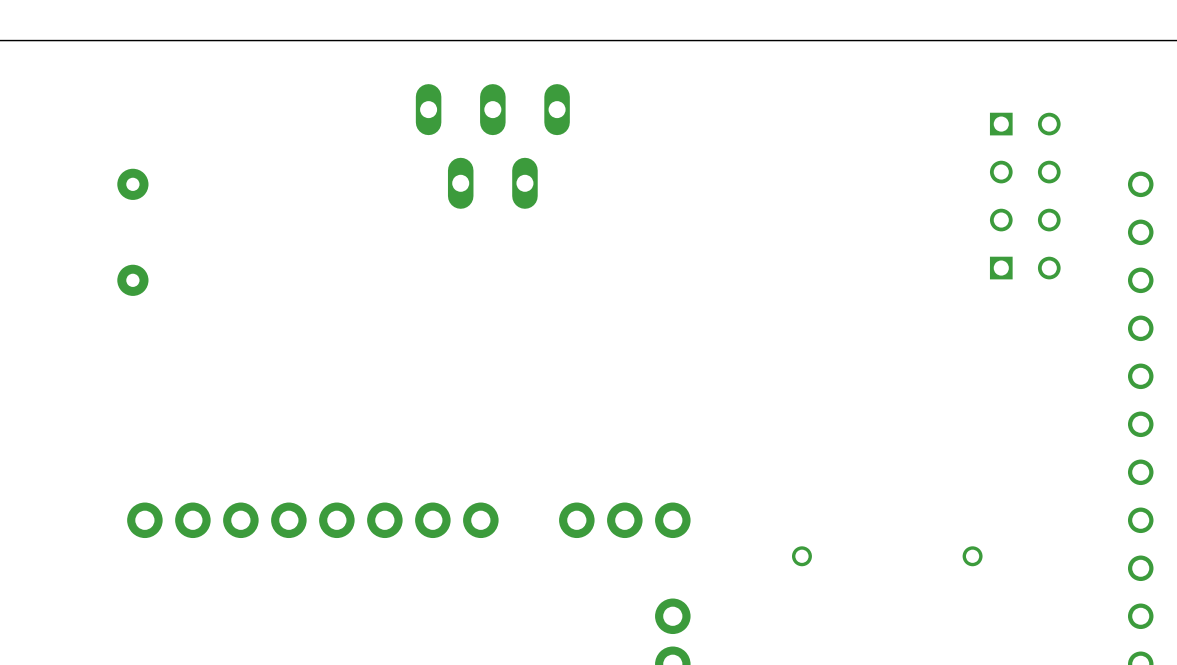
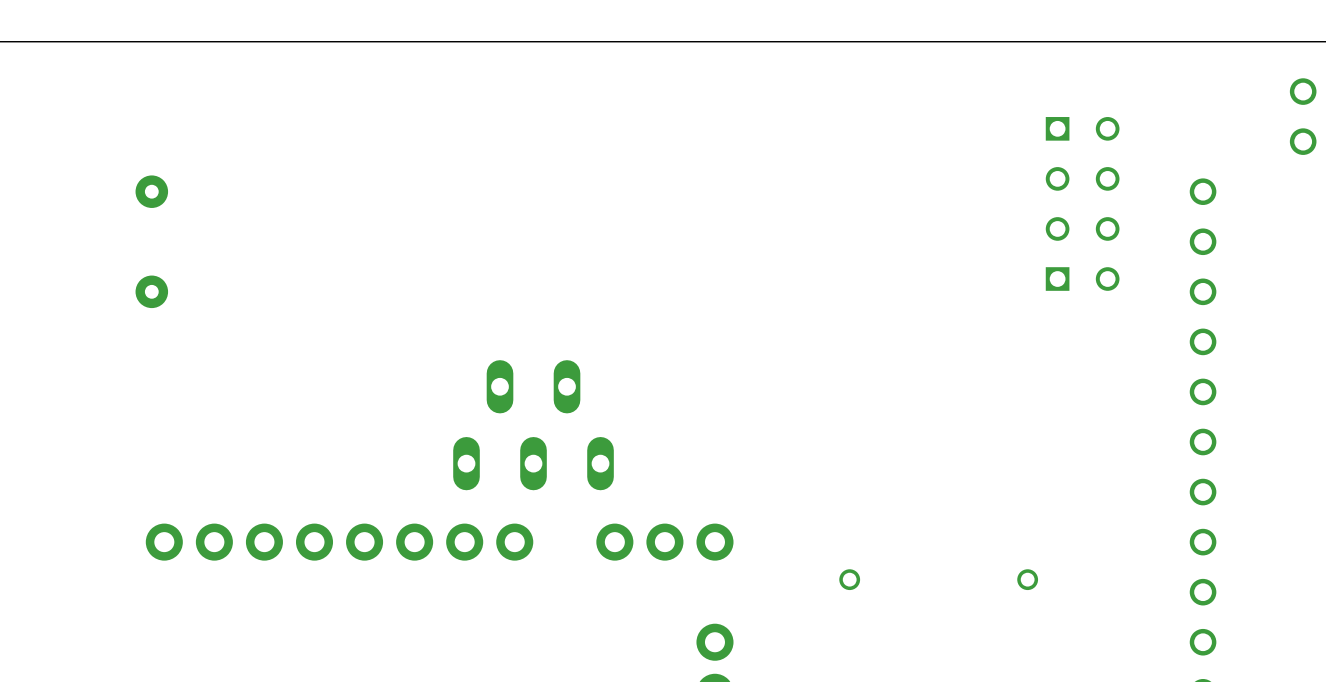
part: (492, 146) -> none
part: none -> (533, 425)

